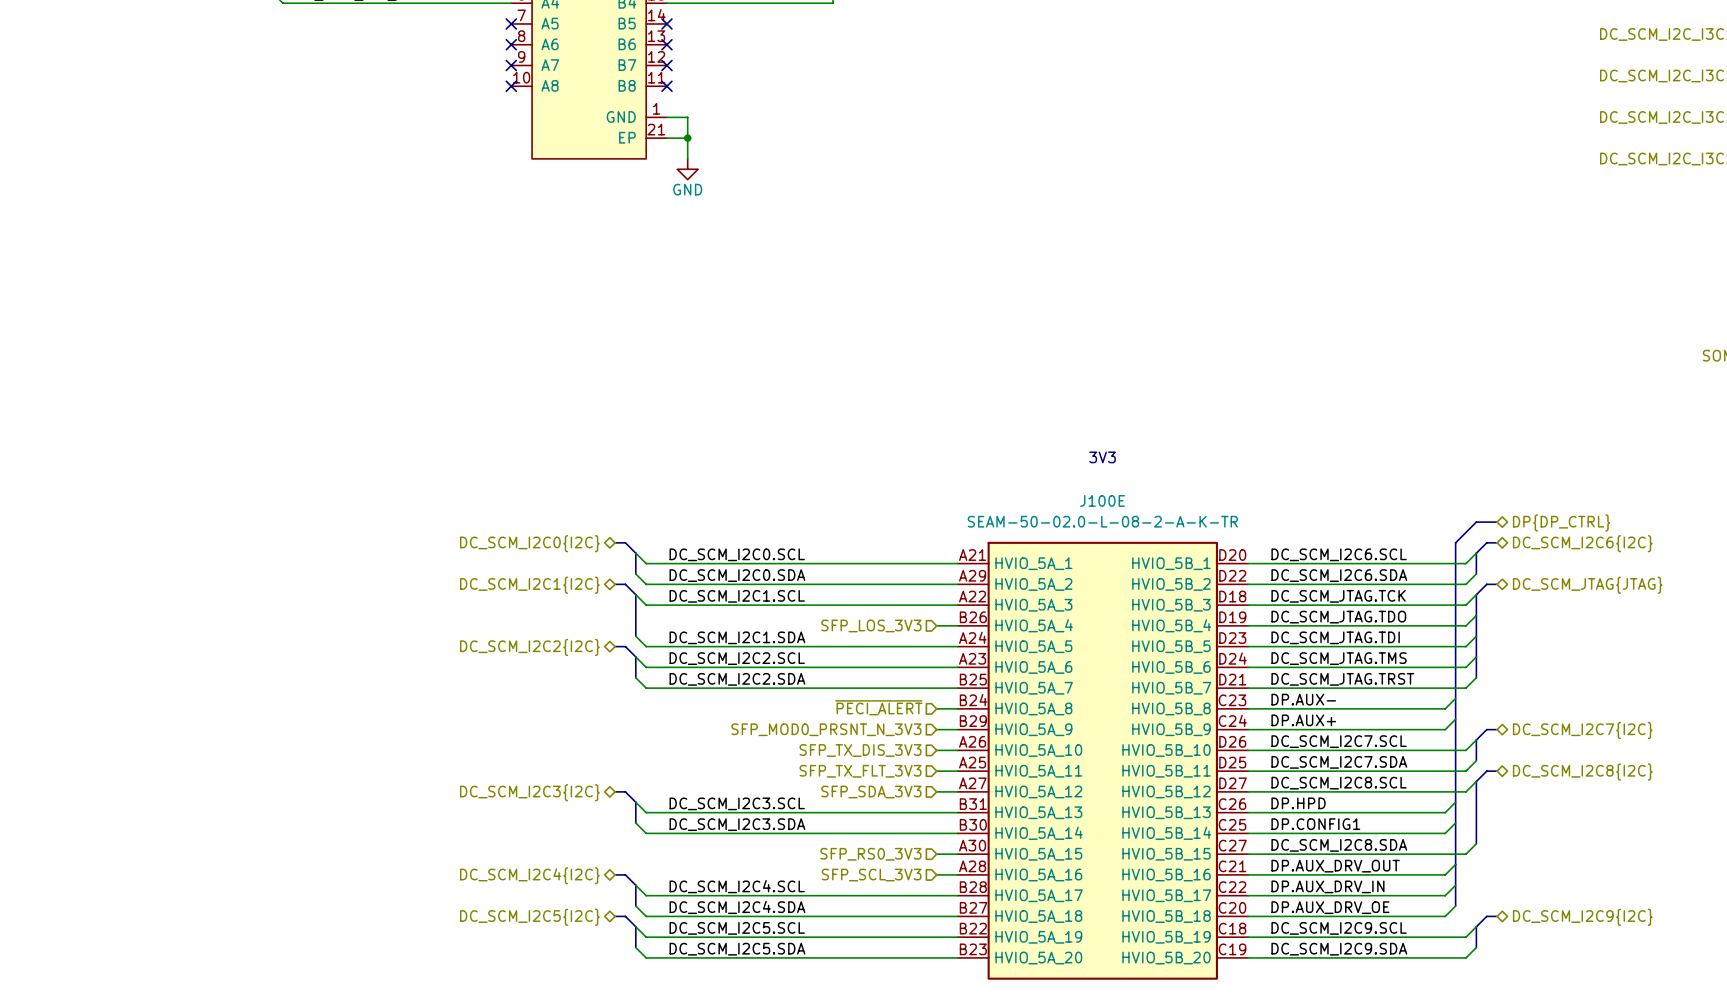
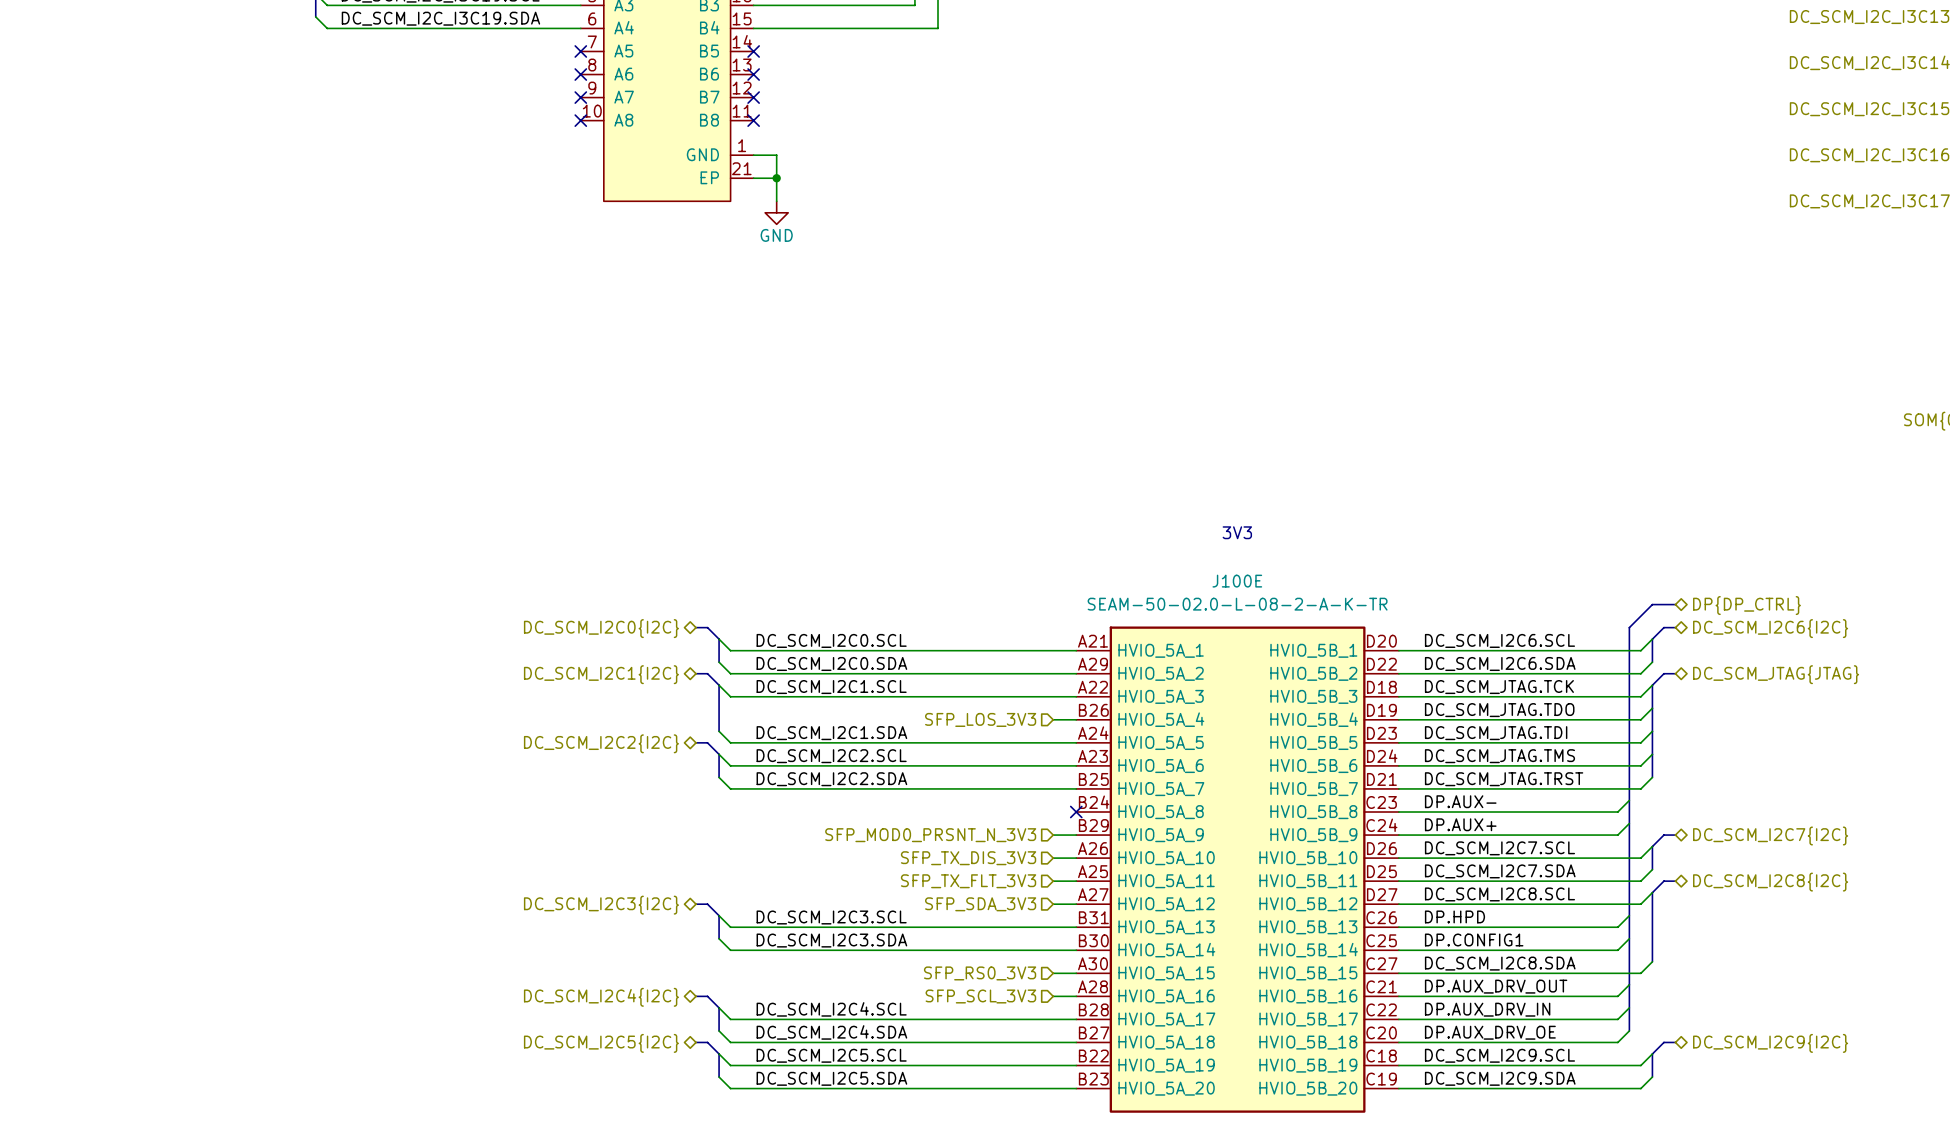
hierarchical label: ~{PECI_ALERT} (878, 707) -> none
wire: (936, 708) (957, 708) -> none
no-connect mark: none -> (1076, 812)

